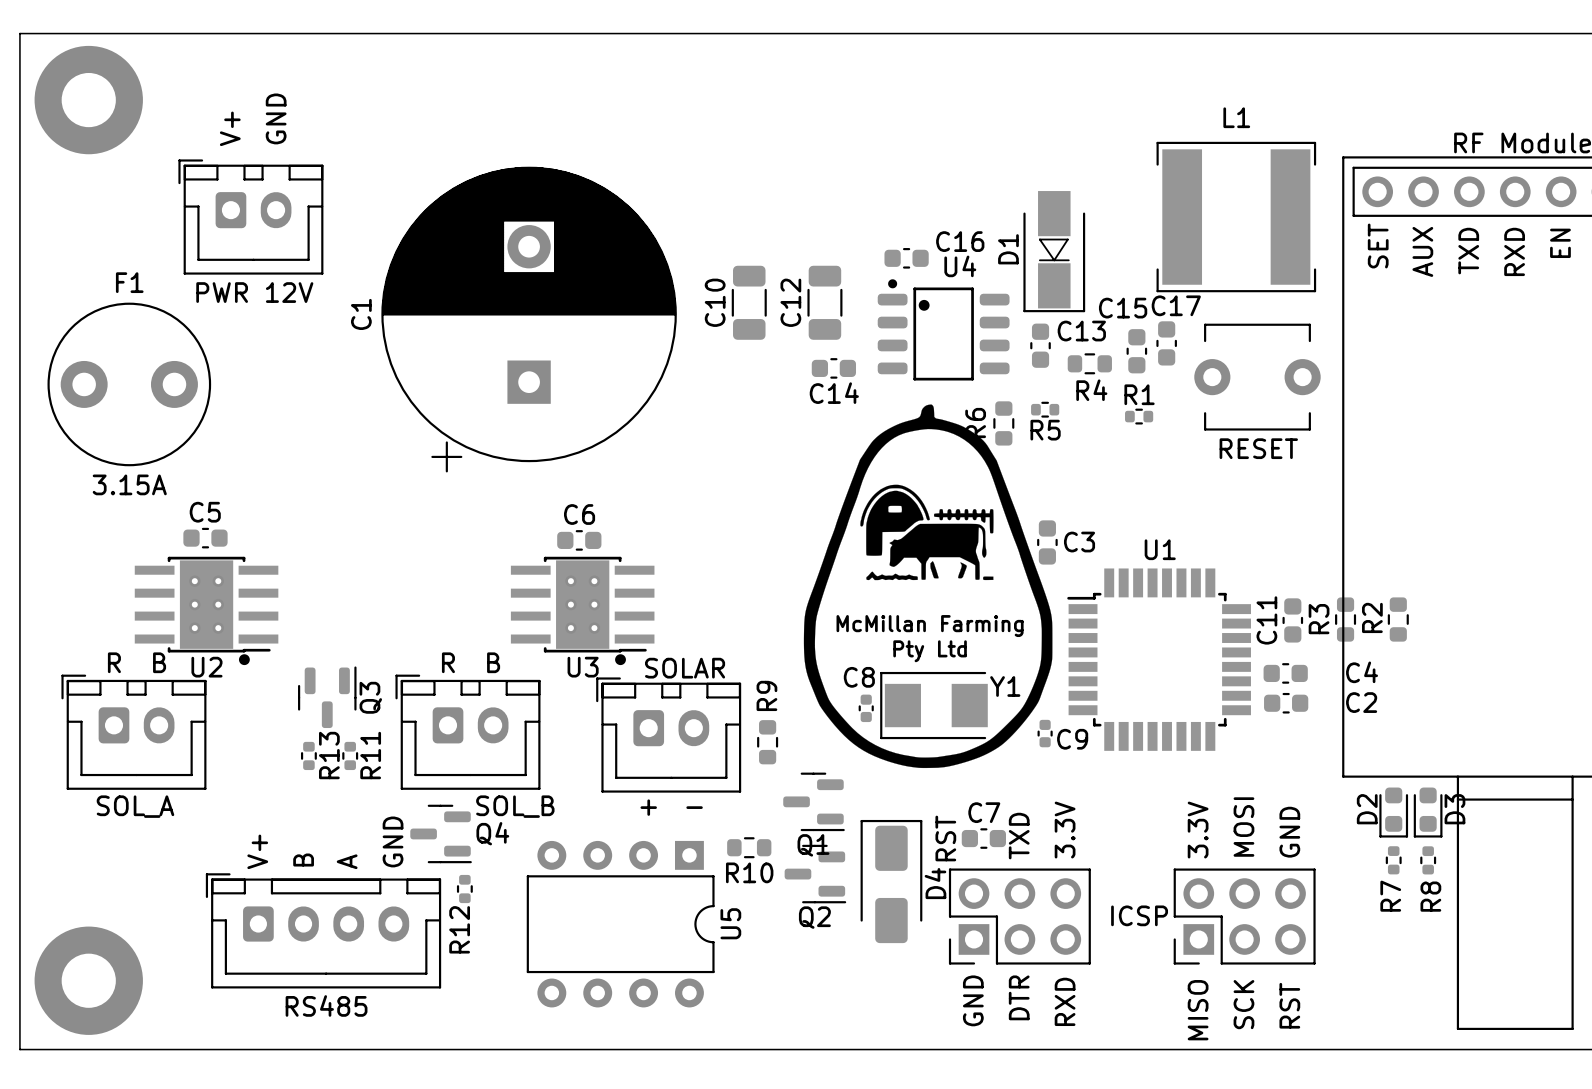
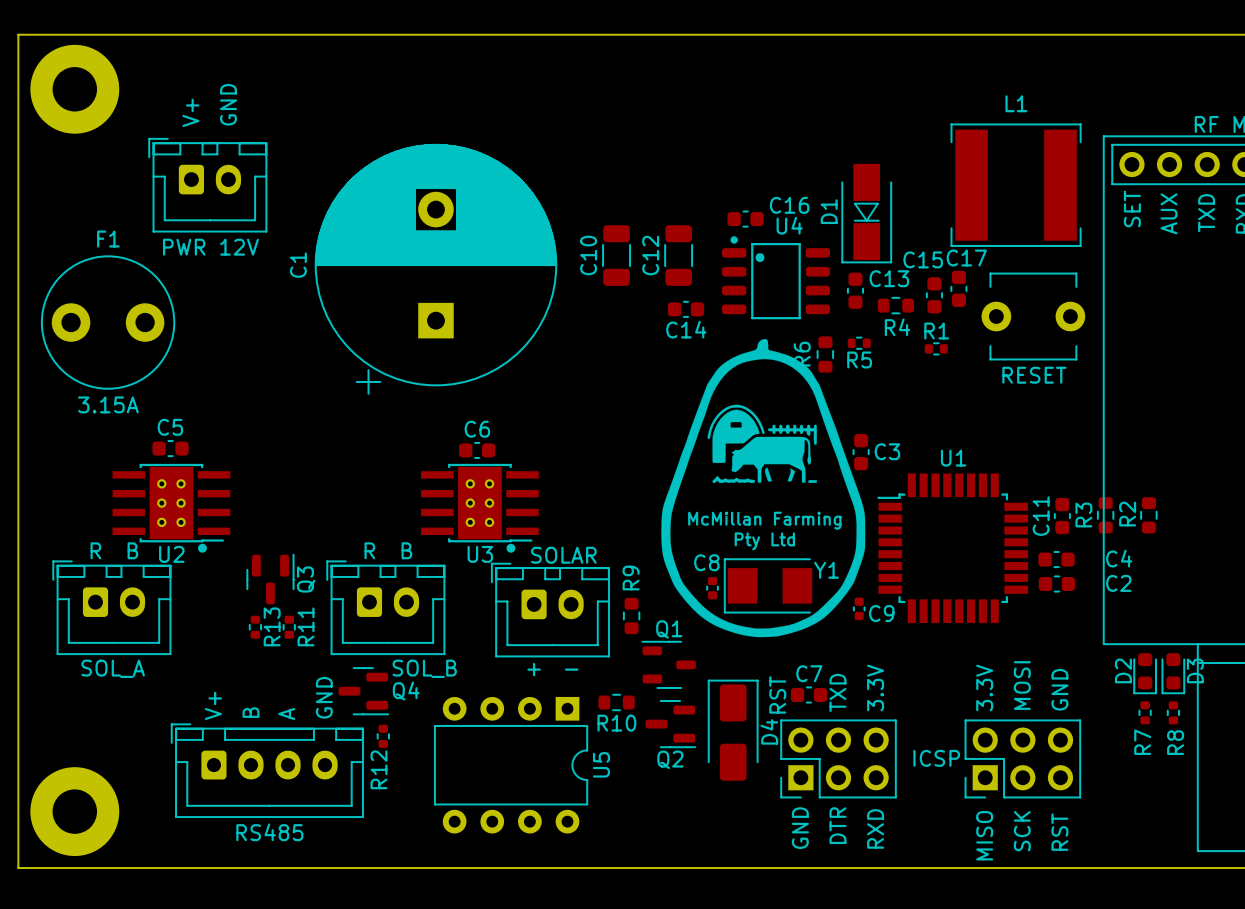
Q1 footprint: [783, 772, 845, 832] -> [641, 640, 696, 689]
Q1 name position: Q1 (813, 845) -> Q1 (669, 629)

